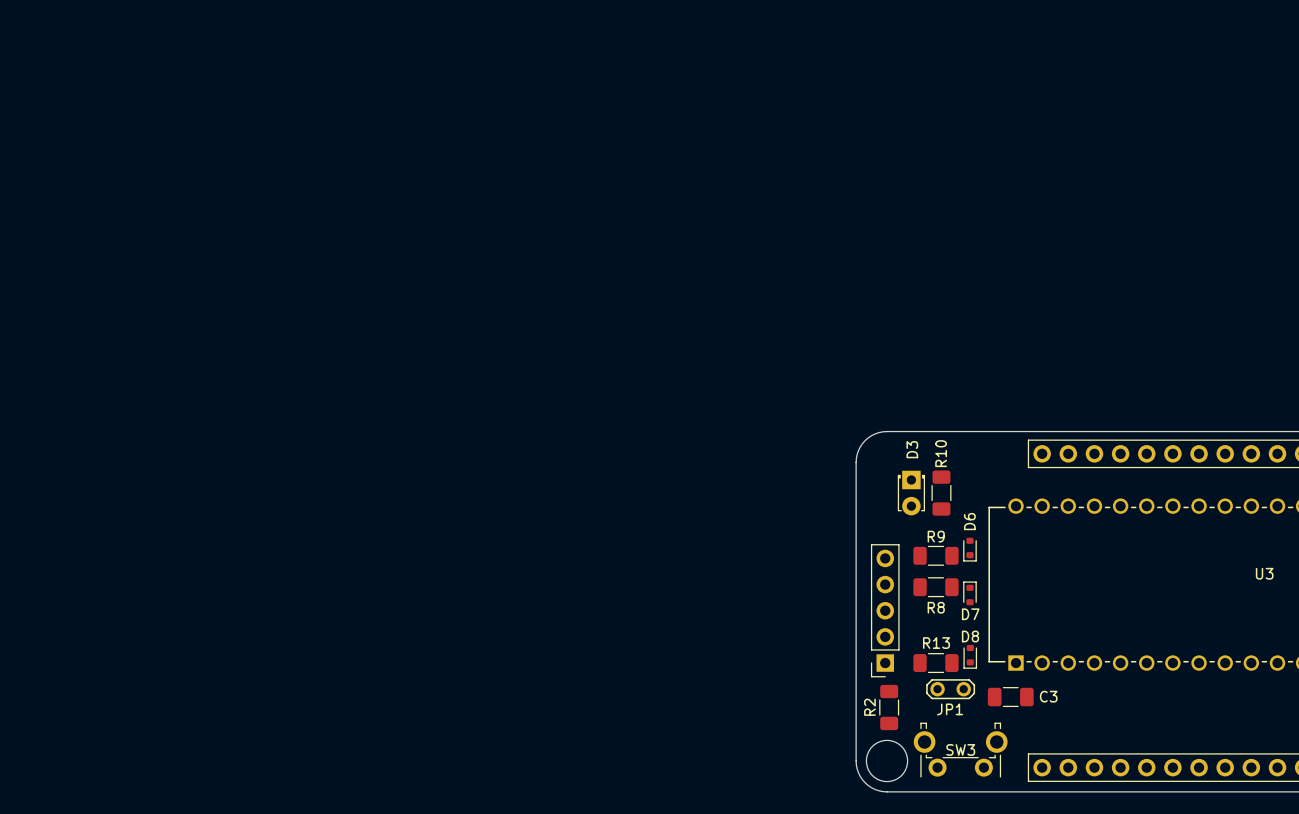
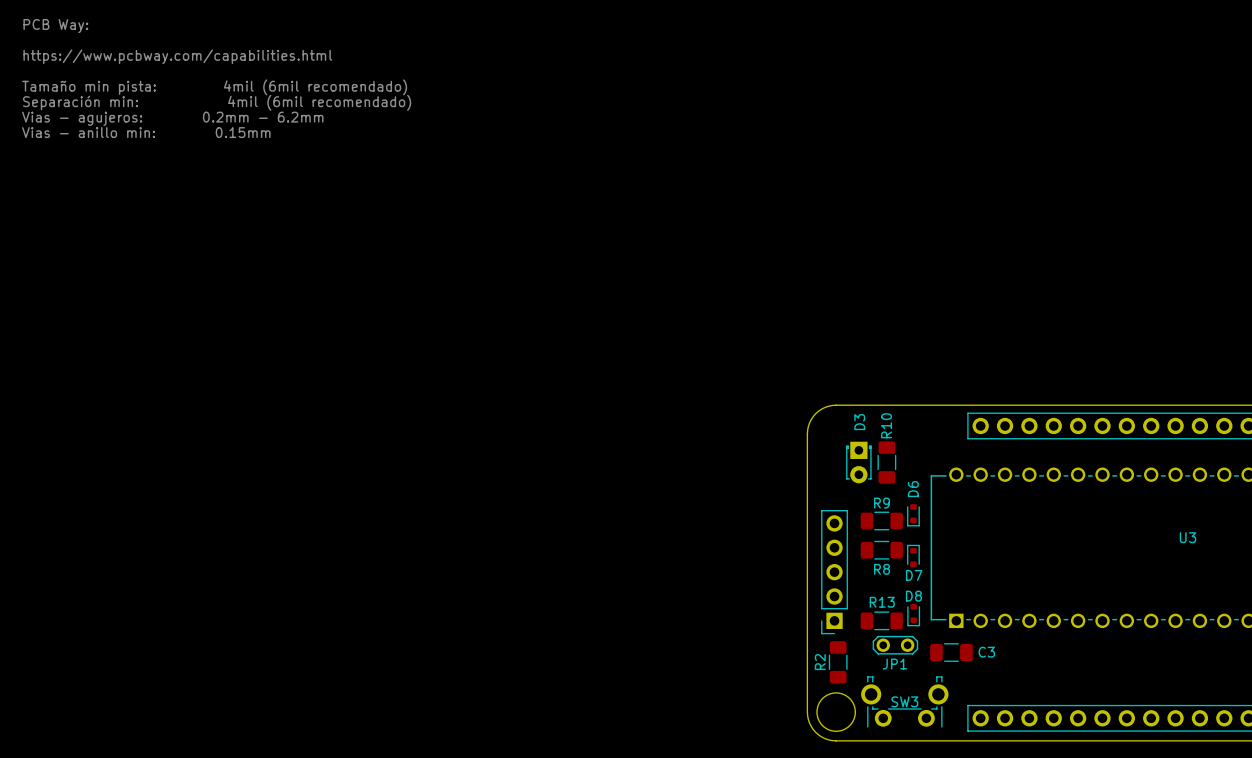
text: none -> PCB Way: (55, 26)
text: none -> https://www.pcbway.com/capabilities.html (177, 56)
text: none -> Tamaño min pista: 4mil (6mil recomendado) (214, 87)
text: none -> Separación min: 4mil (6mil recomendado) (217, 102)
text: none -> Vias - agujeros: 0.2mm - 6.2mm (172, 118)
text: none -> Vias - anillo min: 0.15mm (146, 132)

